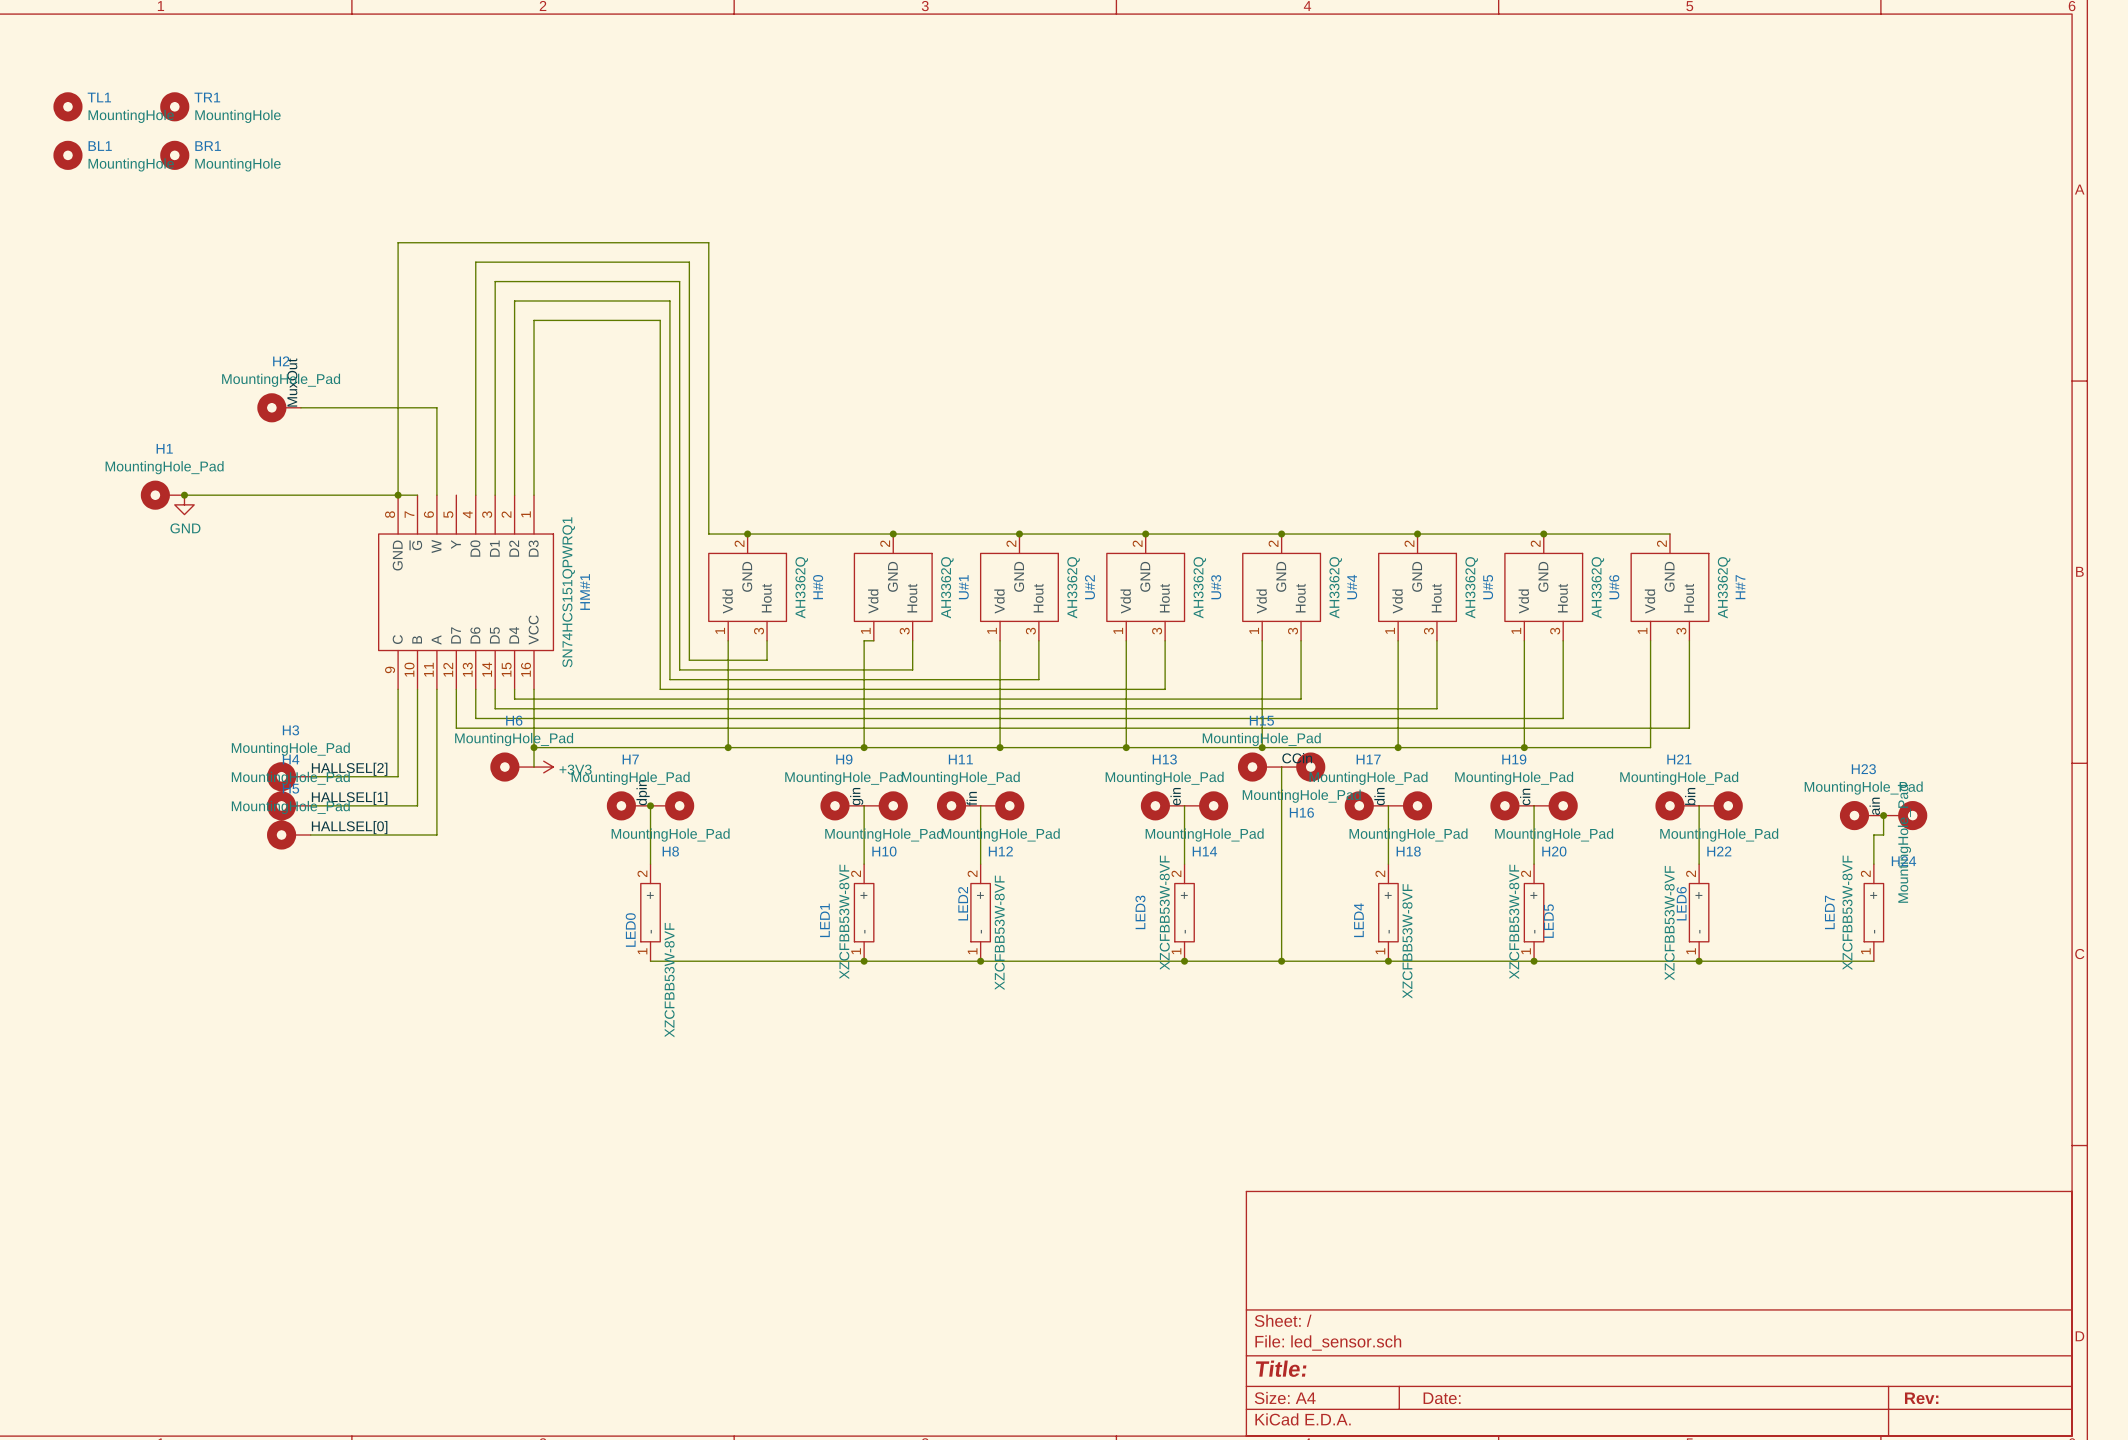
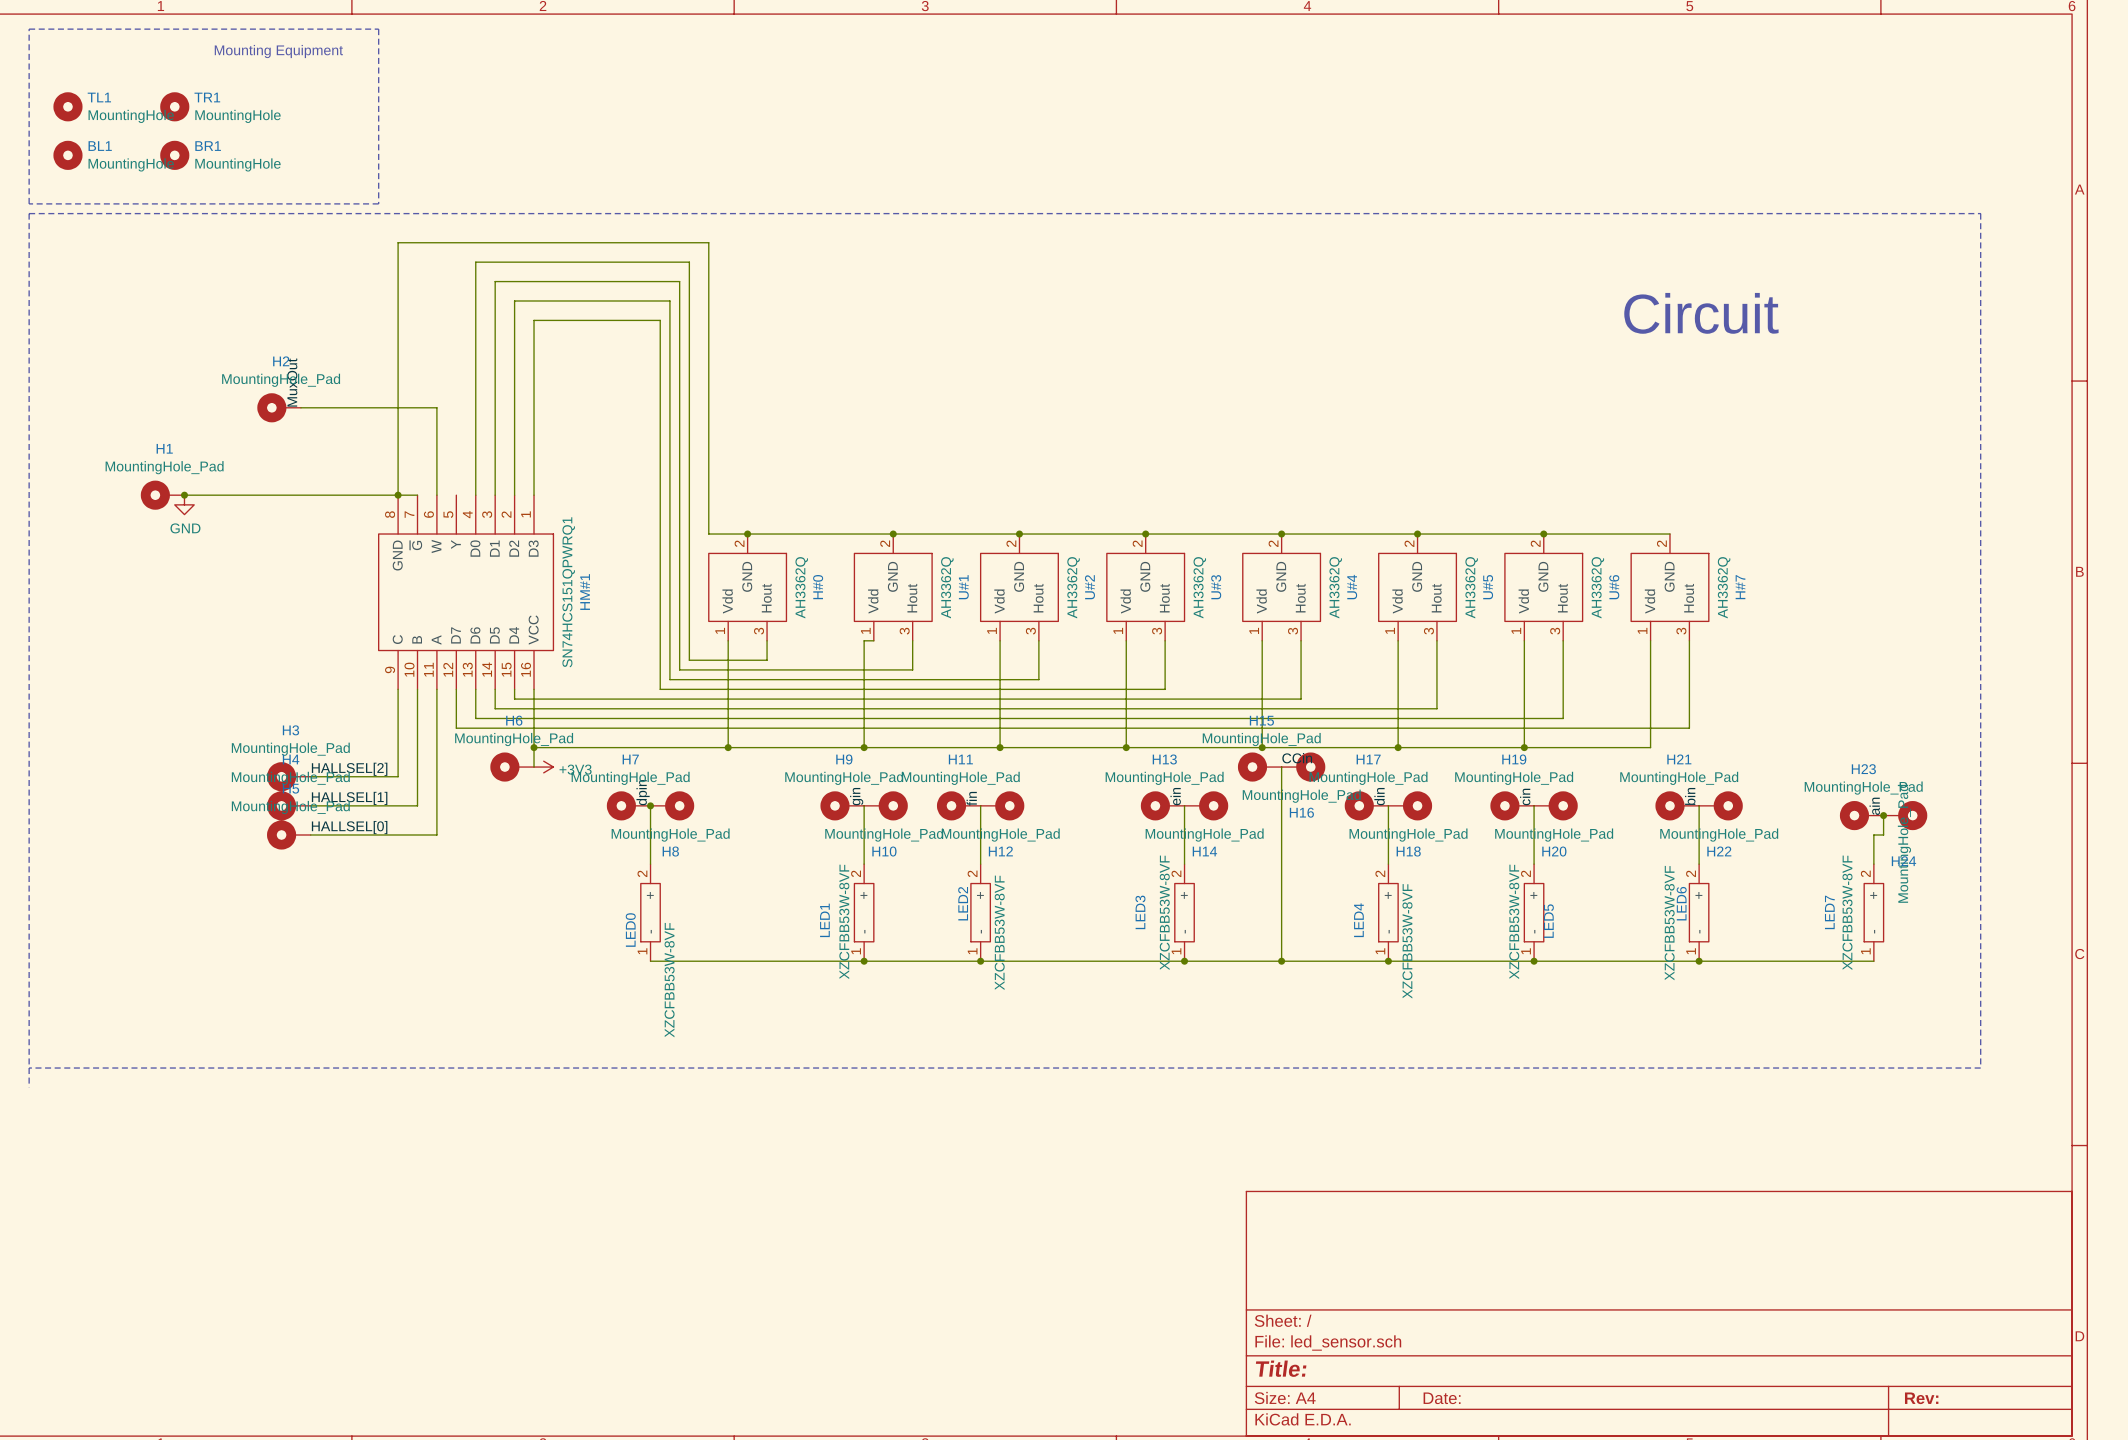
line: none -> (29, 29) (29, 203) (378, 203) (378, 29) (29, 29)
text: none -> Mounting Equipment (278, 51)
text: none -> Circuit (1701, 313)
line: none -> (29, 1068) (1980, 1068) (1980, 213) (29, 213) (29, 1087)

